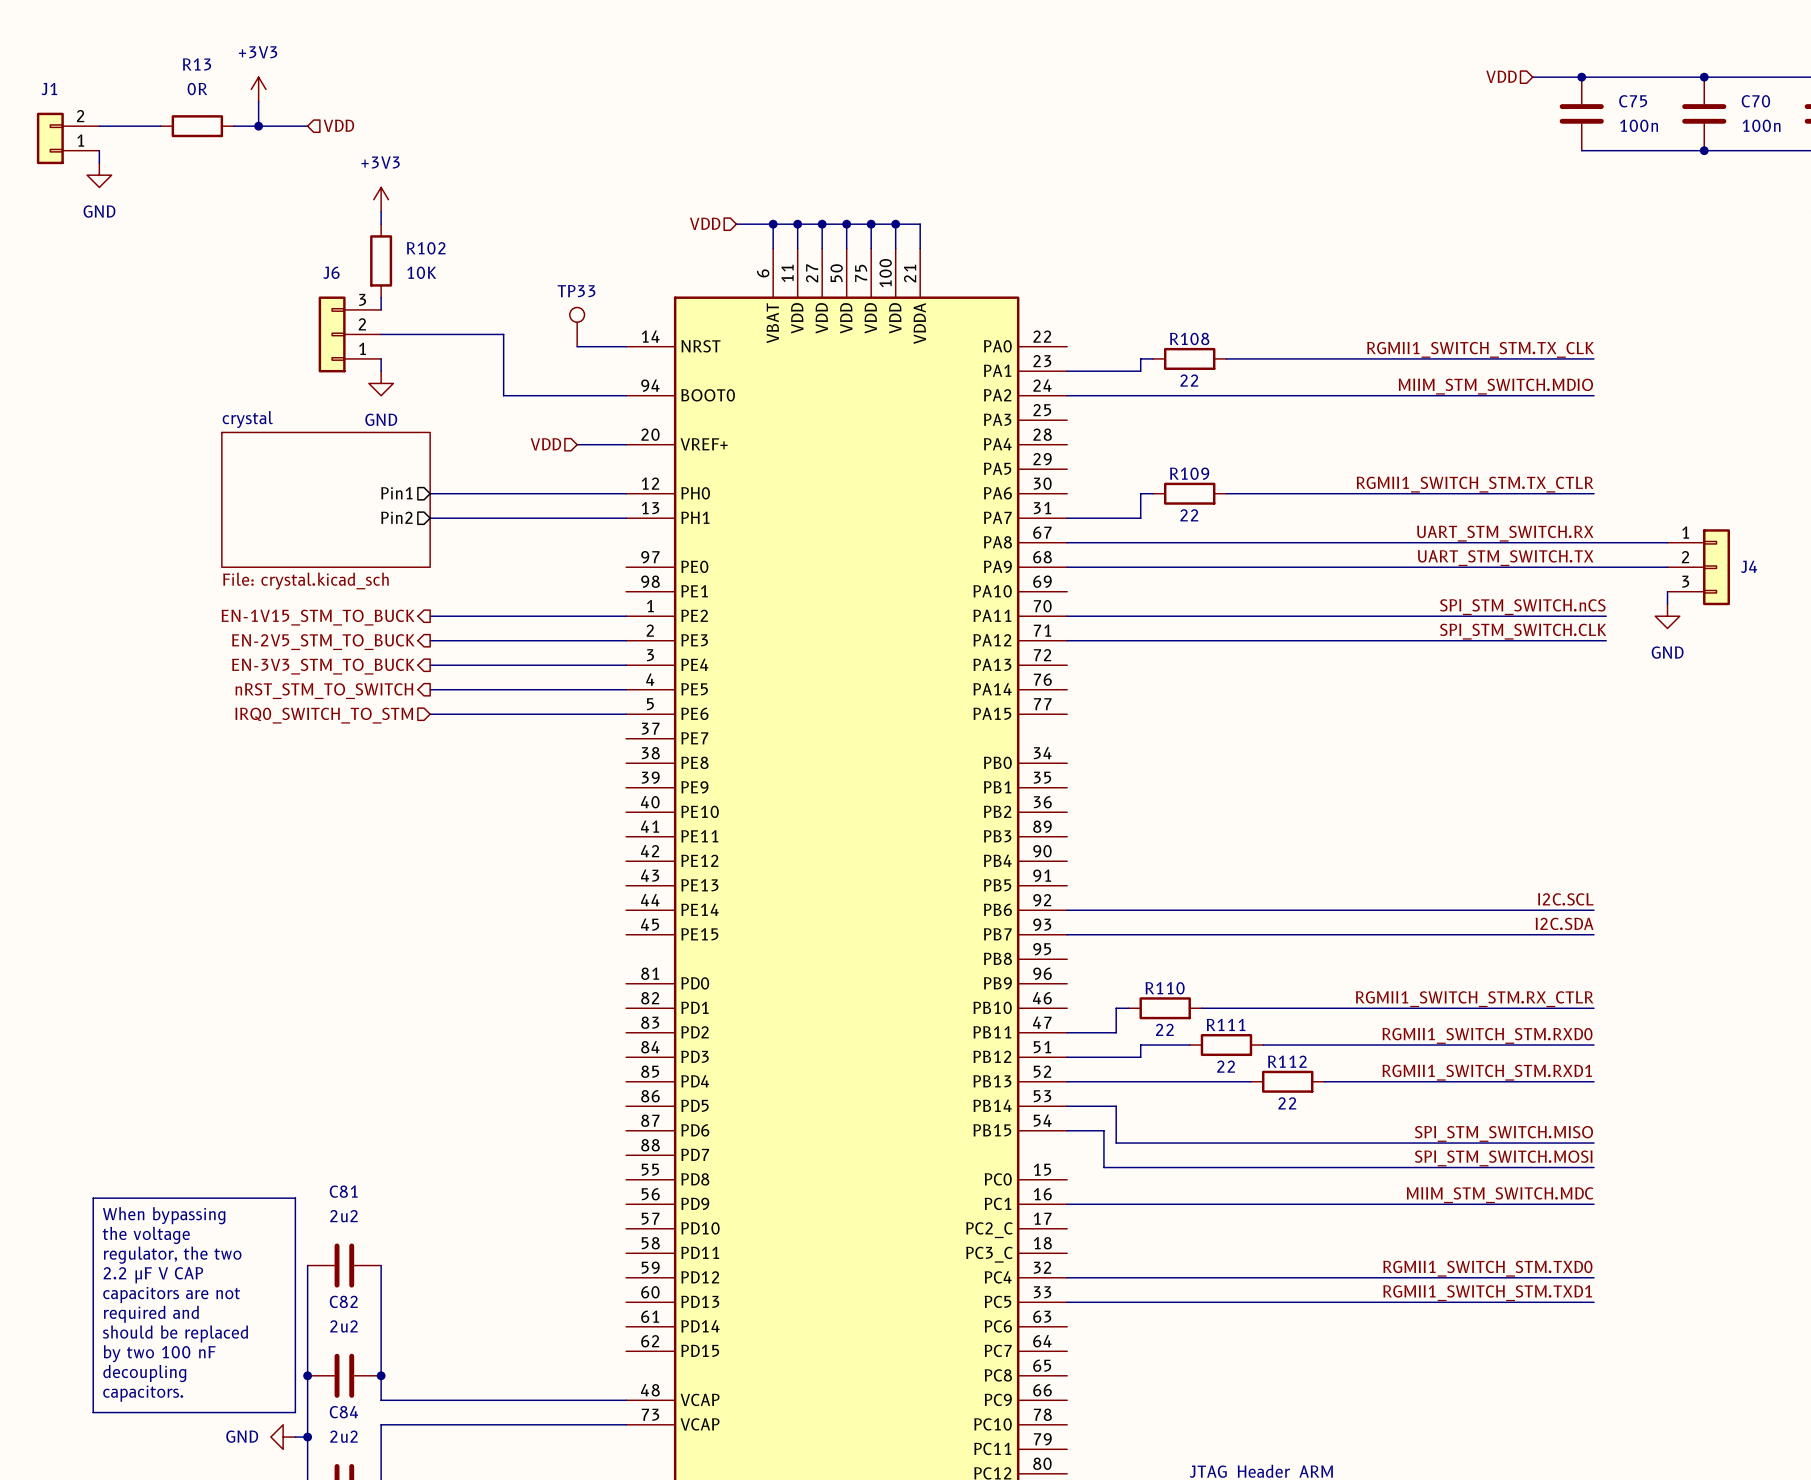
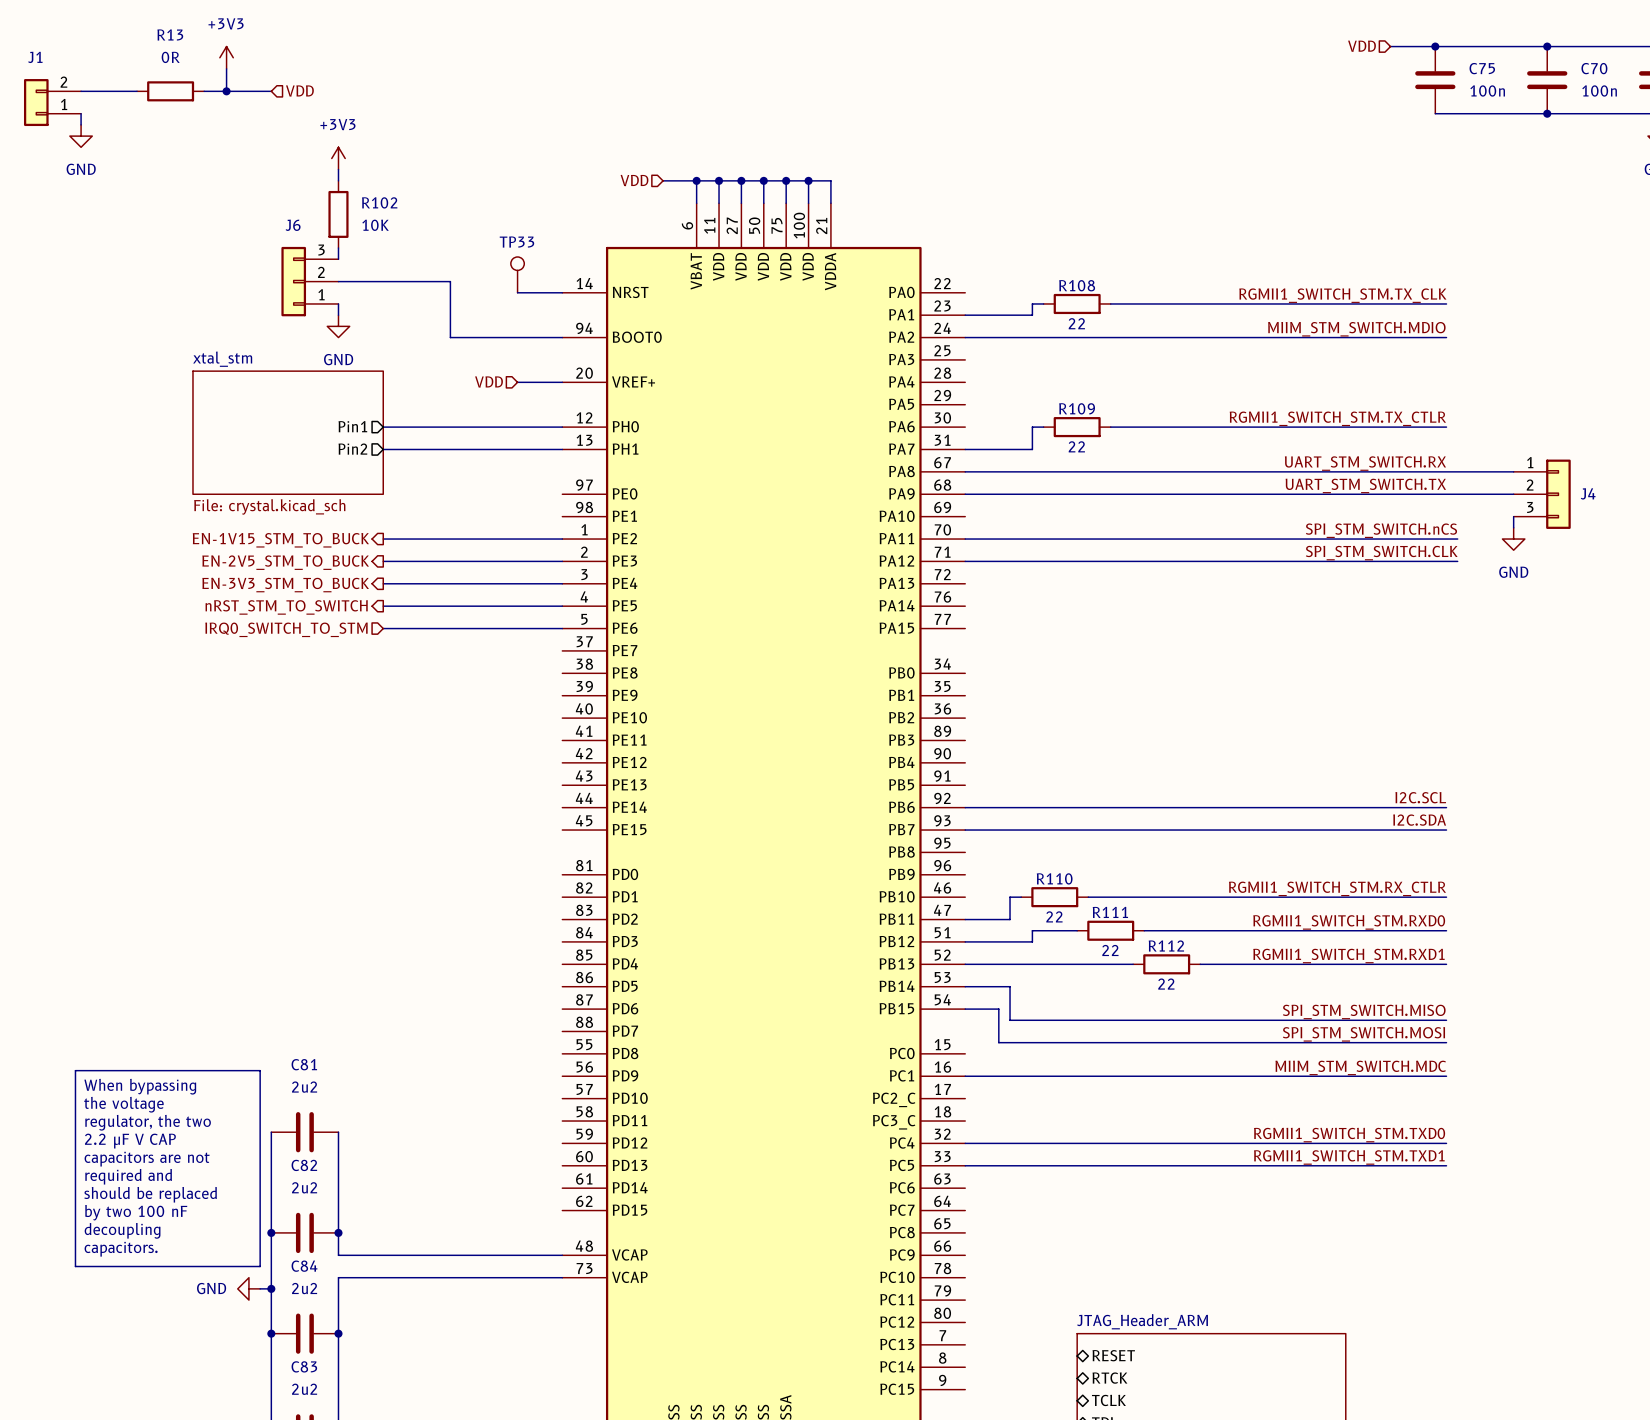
sheet crystal name: crystal (247, 419) -> xtal_stm (222, 359)

